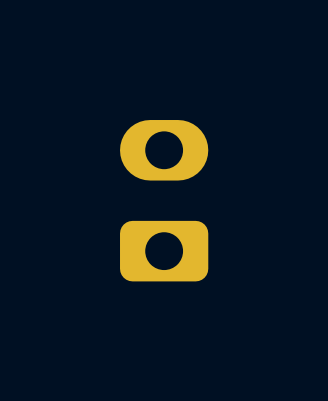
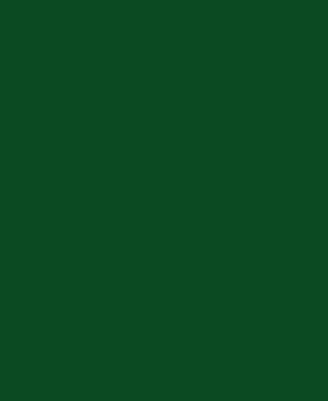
part: (164, 200) -> none

